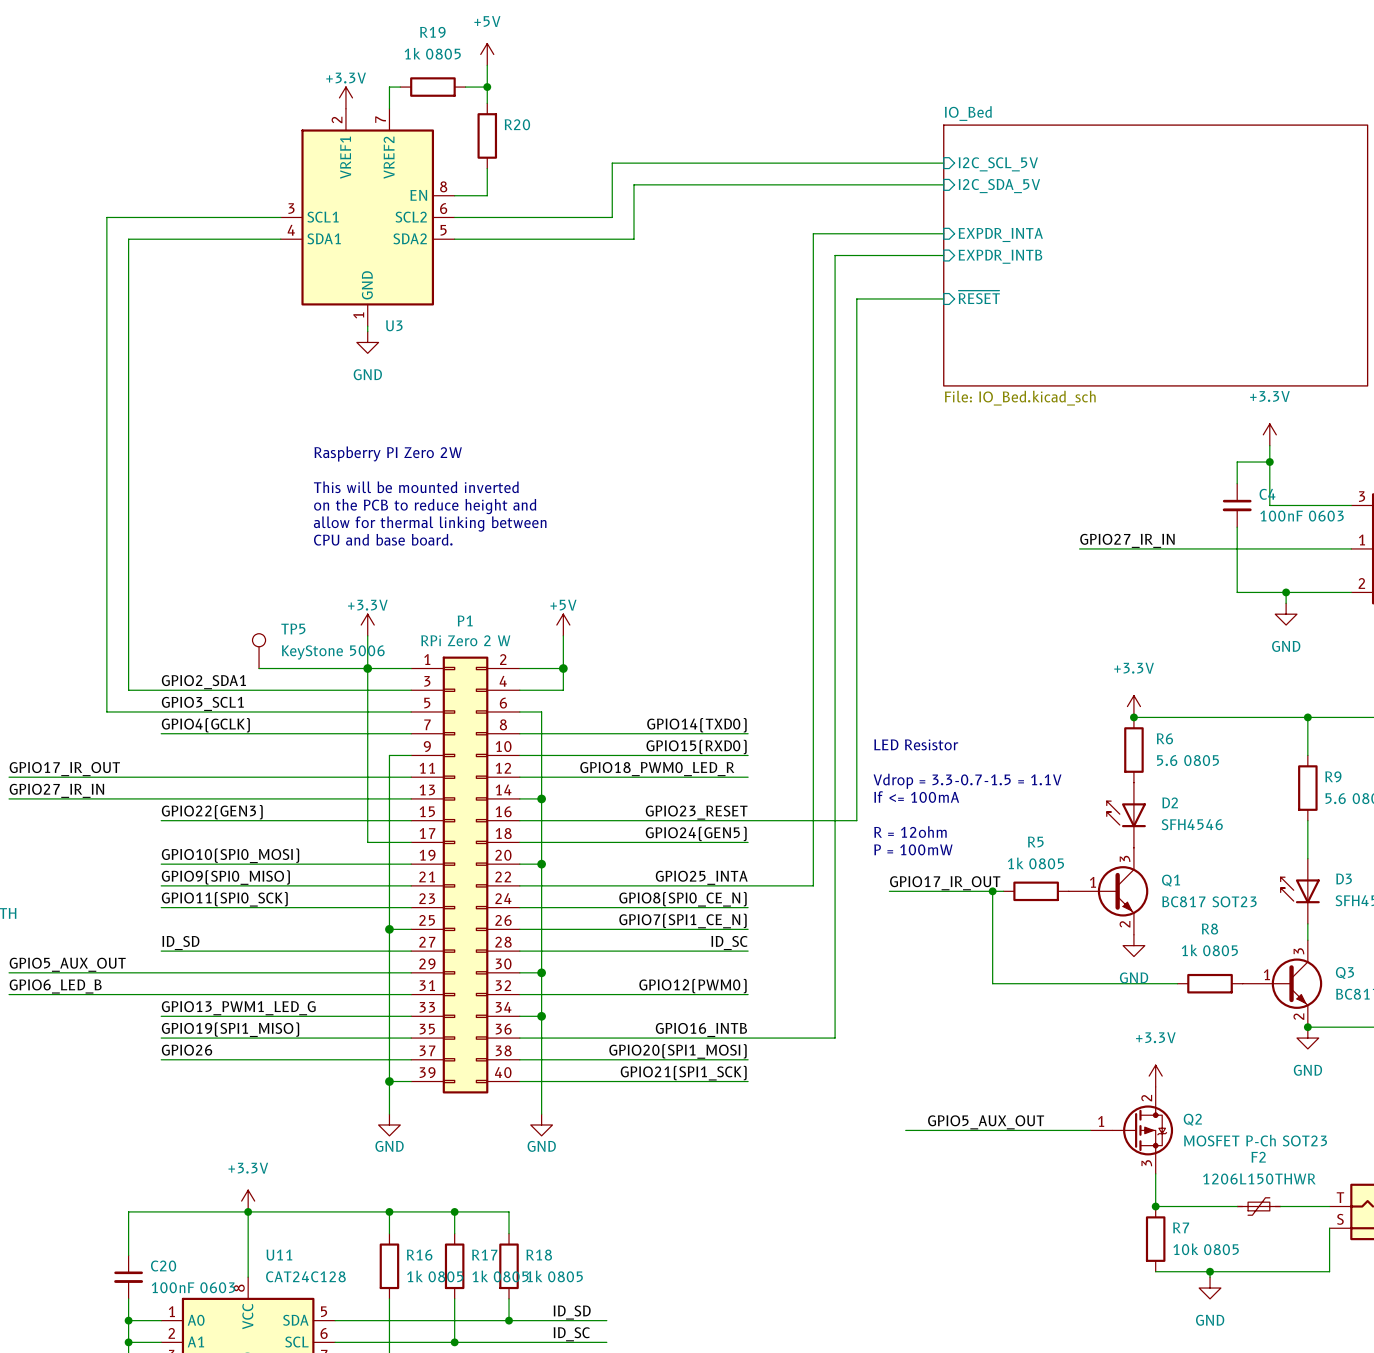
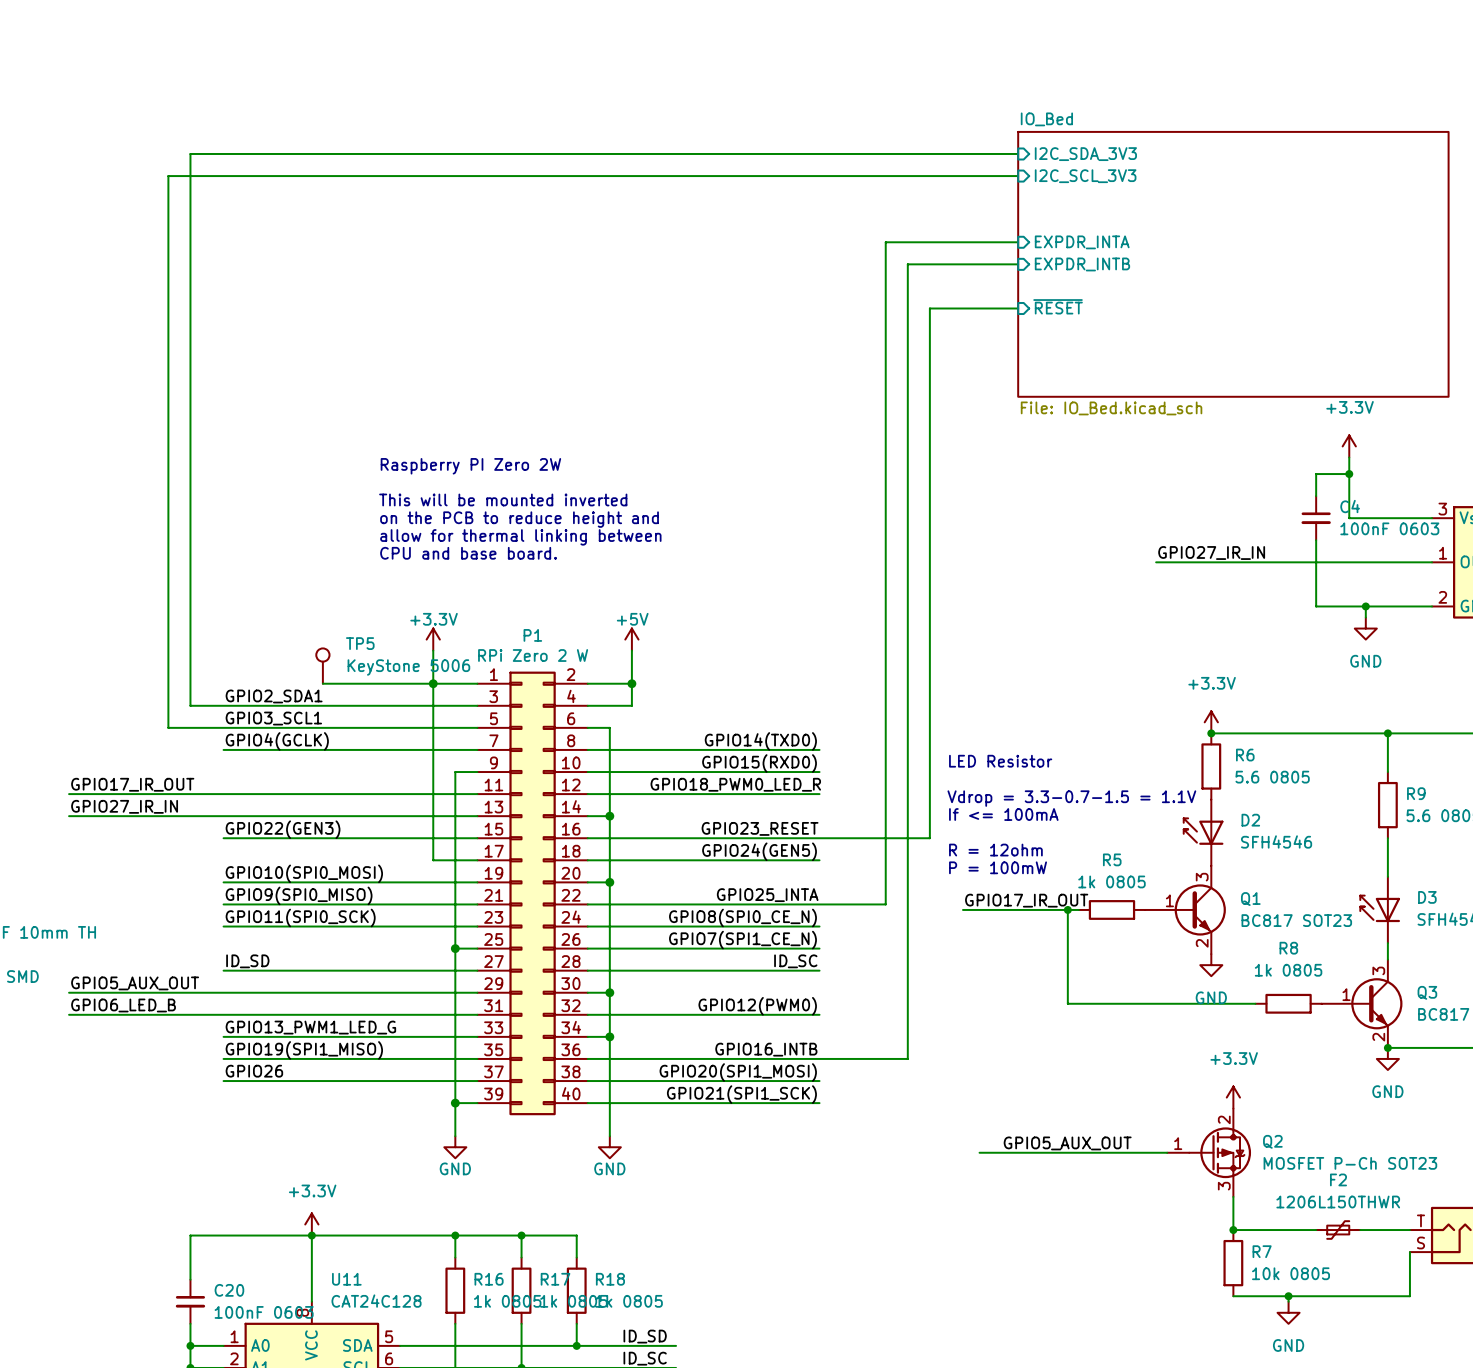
power symbol: +5V (487, 54) -> none
wire: (487, 65) (487, 103) -> none
wire: (400, 87) (389, 87) (389, 108) -> none
R19: 1k 0805 (432, 87) -> none
wire: (465, 87) (487, 87) -> none
junction: (487, 87) -> none
power symbol: +3.3V (345, 97) -> none
R20: (487, 135) -> none
sheet pin: none -> I2C_SDA_3V3 (1085, 154)
wire: (943, 163) (612, 163) (612, 217) (454, 217) -> none
sheet pin: I2C_SCL_5V (998, 164) -> I2C_SCL_3V3 (1085, 176)
wire: (487, 168) (487, 195) (454, 195) -> none
wire: (943, 184) (633, 184) (633, 239) (454, 239) -> none
sheet pin: I2C_SDA_5V (999, 186) -> none
wire: (106, 217) (280, 217) -> (168, 225) (168, 176) (1018, 176)
U3: (367, 217) -> none
wire: (128, 239) (280, 239) -> (190, 247) (190, 153) (1018, 153)
wire: (367, 326) (367, 331) -> none
power symbol: GND (367, 342) -> none

